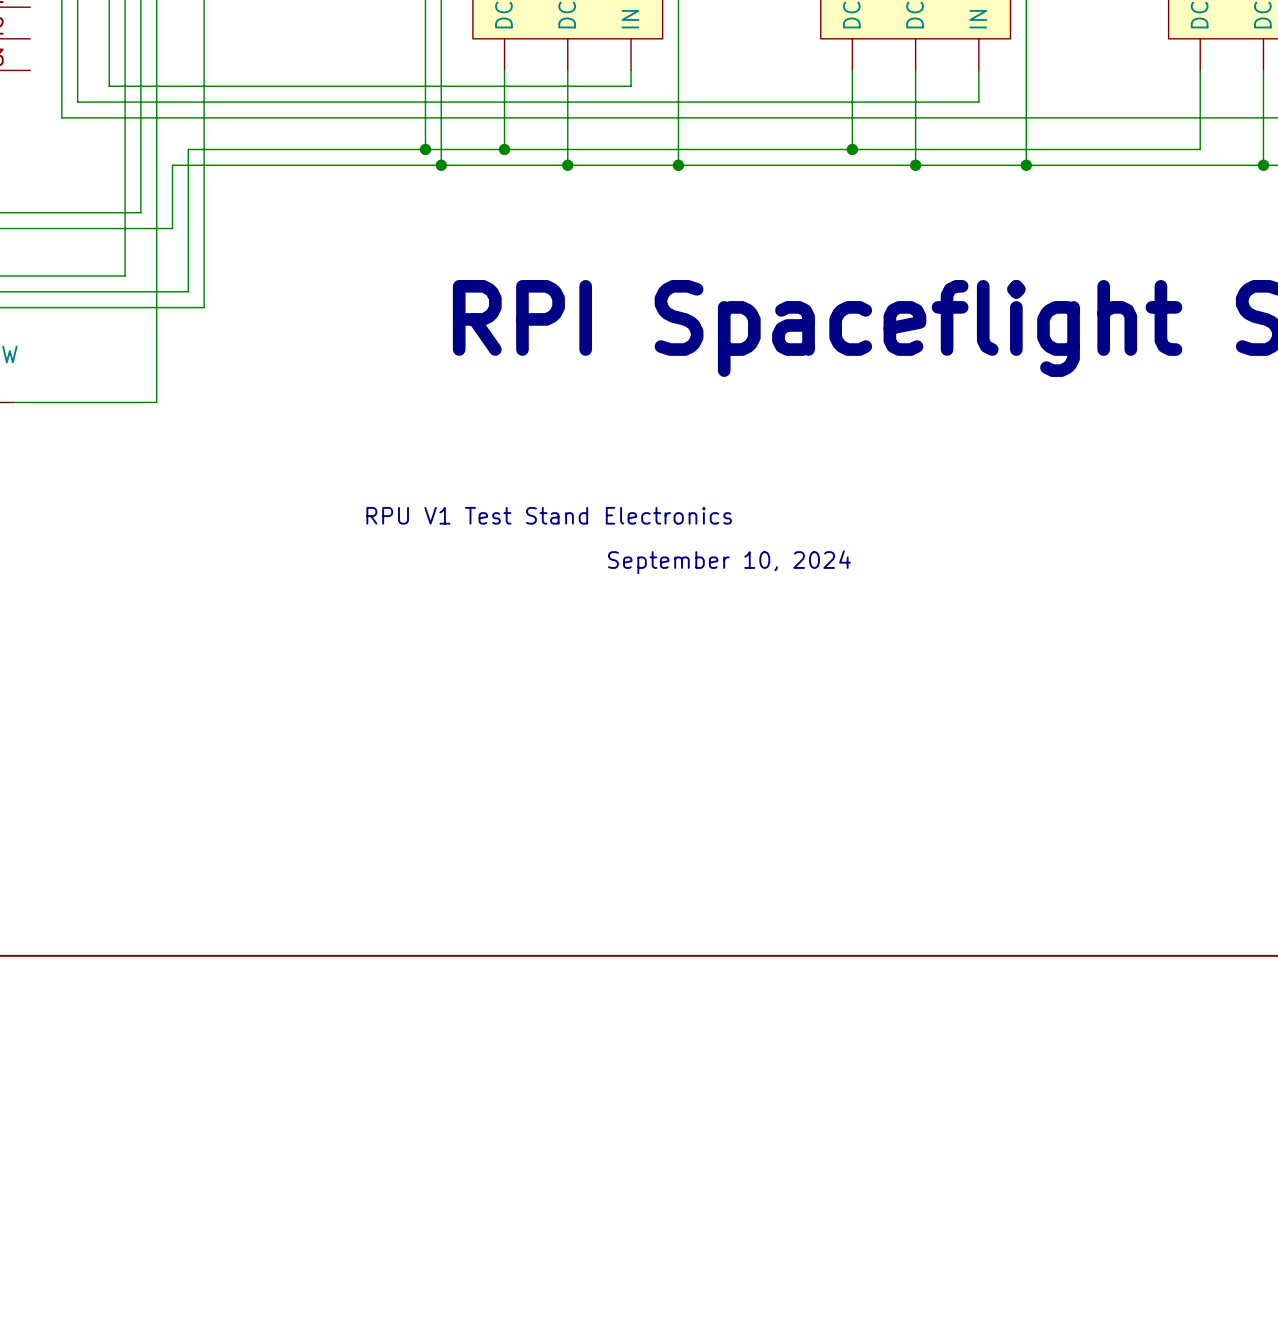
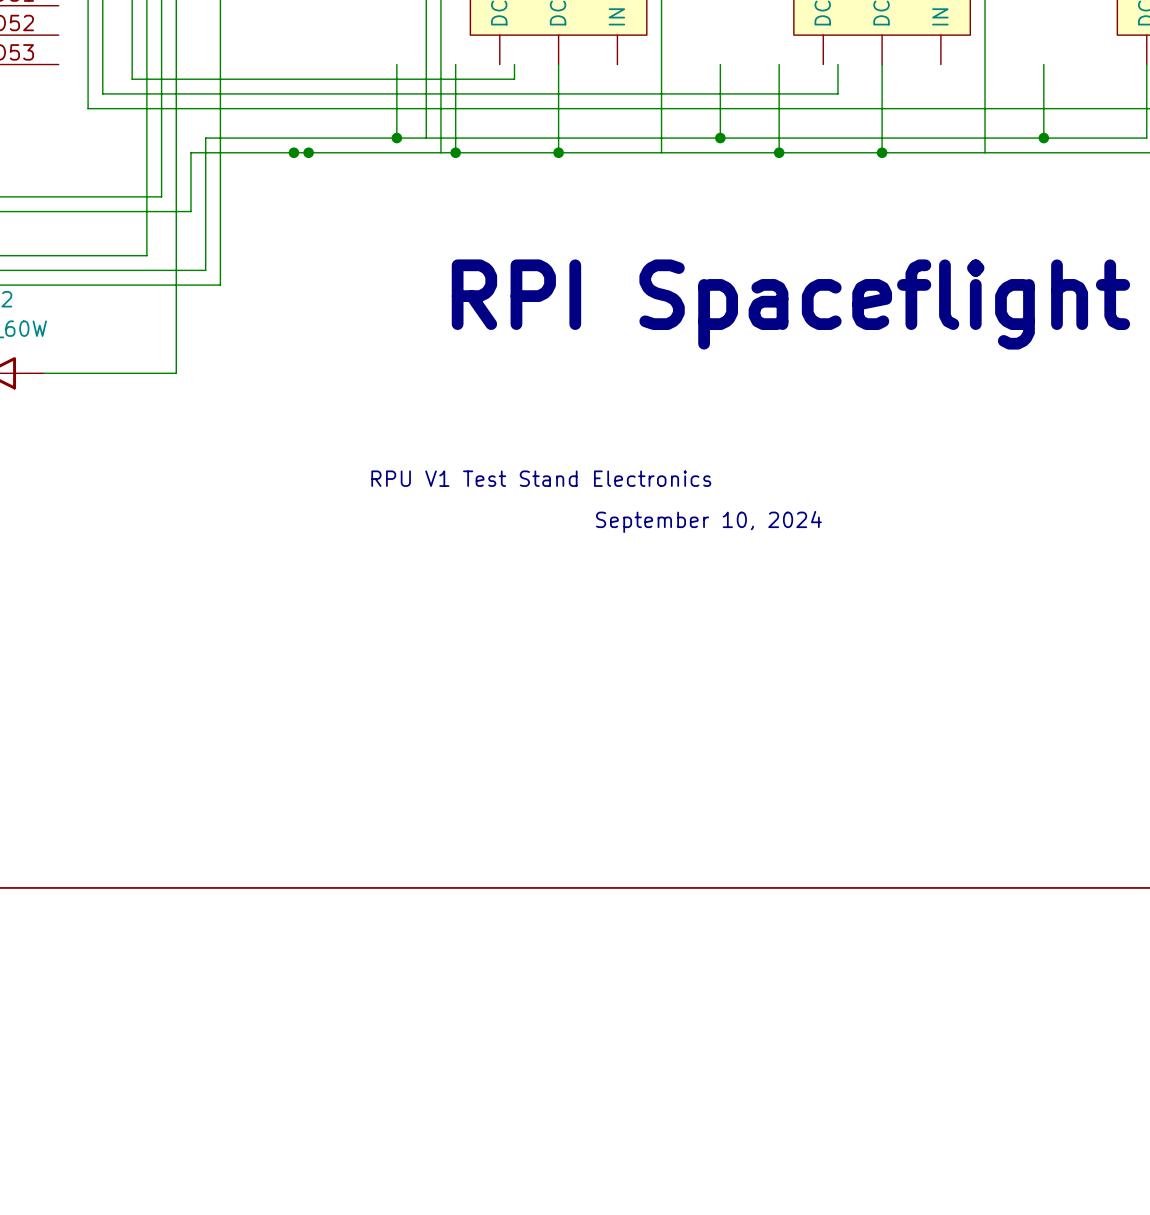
wire: none -> (455, 64) (455, 152)
wire: (504, 70) (504, 149) -> (396, 64) (396, 138)
wire: (631, 70) (631, 86) (520, 86) -> (514, 64) (514, 79)
wire: none -> (779, 64) (779, 152)
wire: (852, 70) (852, 149) -> (720, 64) (720, 138)
wire: (978, 70) (978, 102) (868, 102) -> (837, 64) (837, 93)
wire: none -> (1043, 64) (1043, 138)
junction: none -> (396, 138)
junction: (425, 149) -> none
junction: (504, 149) -> none
junction: none -> (720, 138)
junction position: (852, 149) -> (779, 152)
junction: none -> (293, 152)
junction: none -> (308, 152)
junction position: (441, 165) -> (455, 152)
junction: (678, 165) -> none
junction position: (1026, 165) -> (1043, 138)

